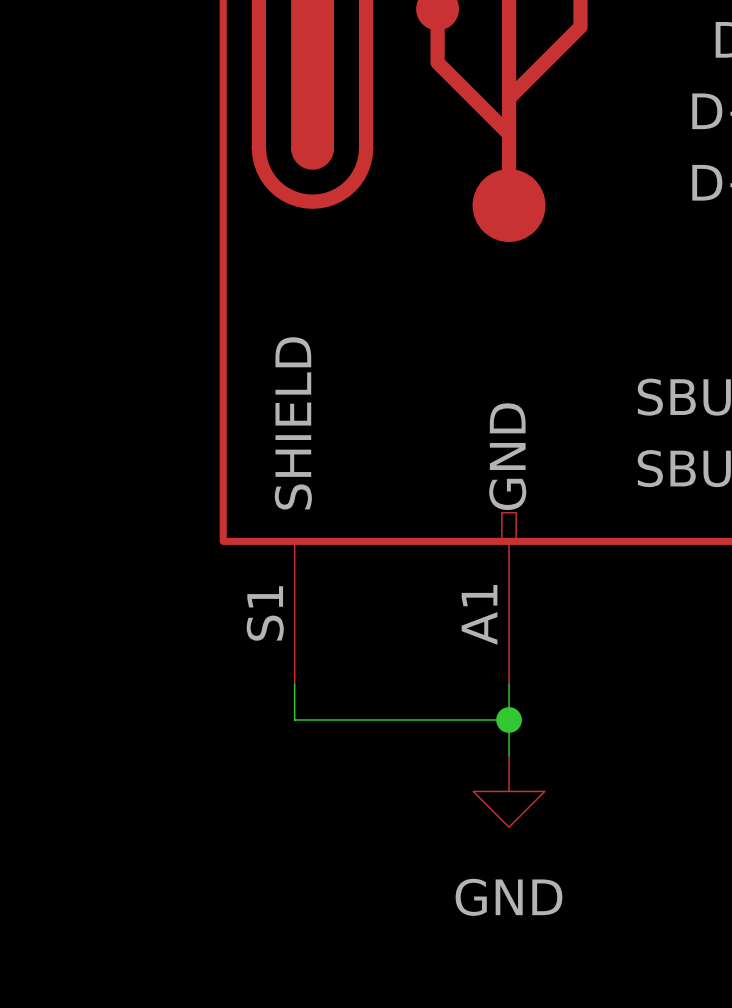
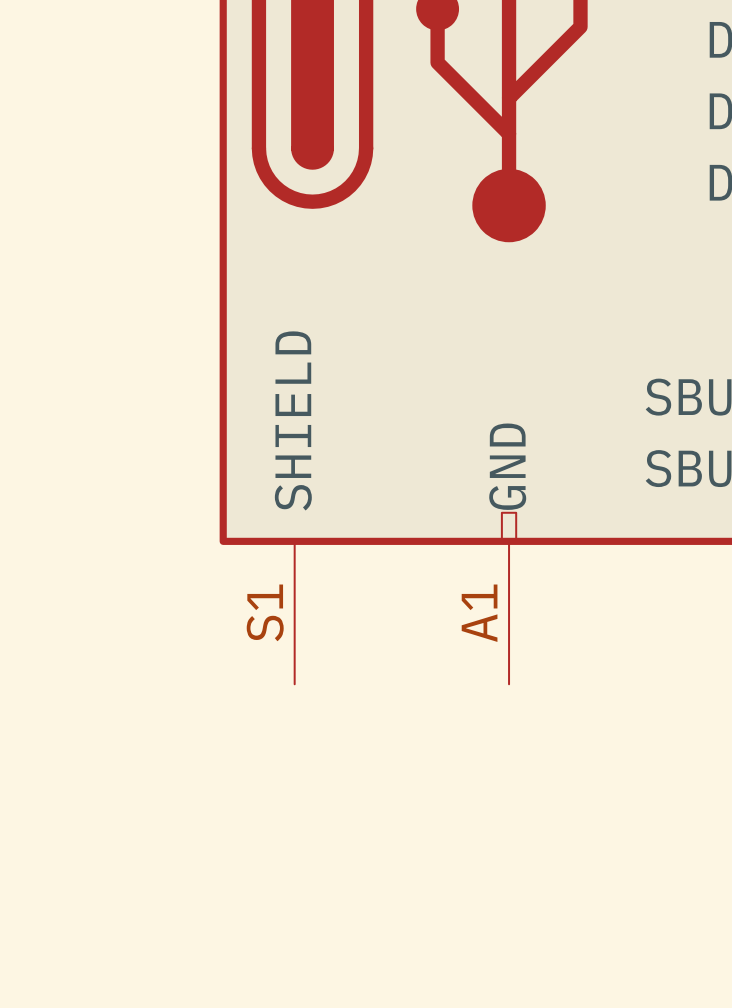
wire: (294, 684) (294, 720) (509, 720) -> none
wire: (509, 684) (509, 755) -> none
junction: (509, 720) -> none
power symbol: GND (509, 791) -> none

